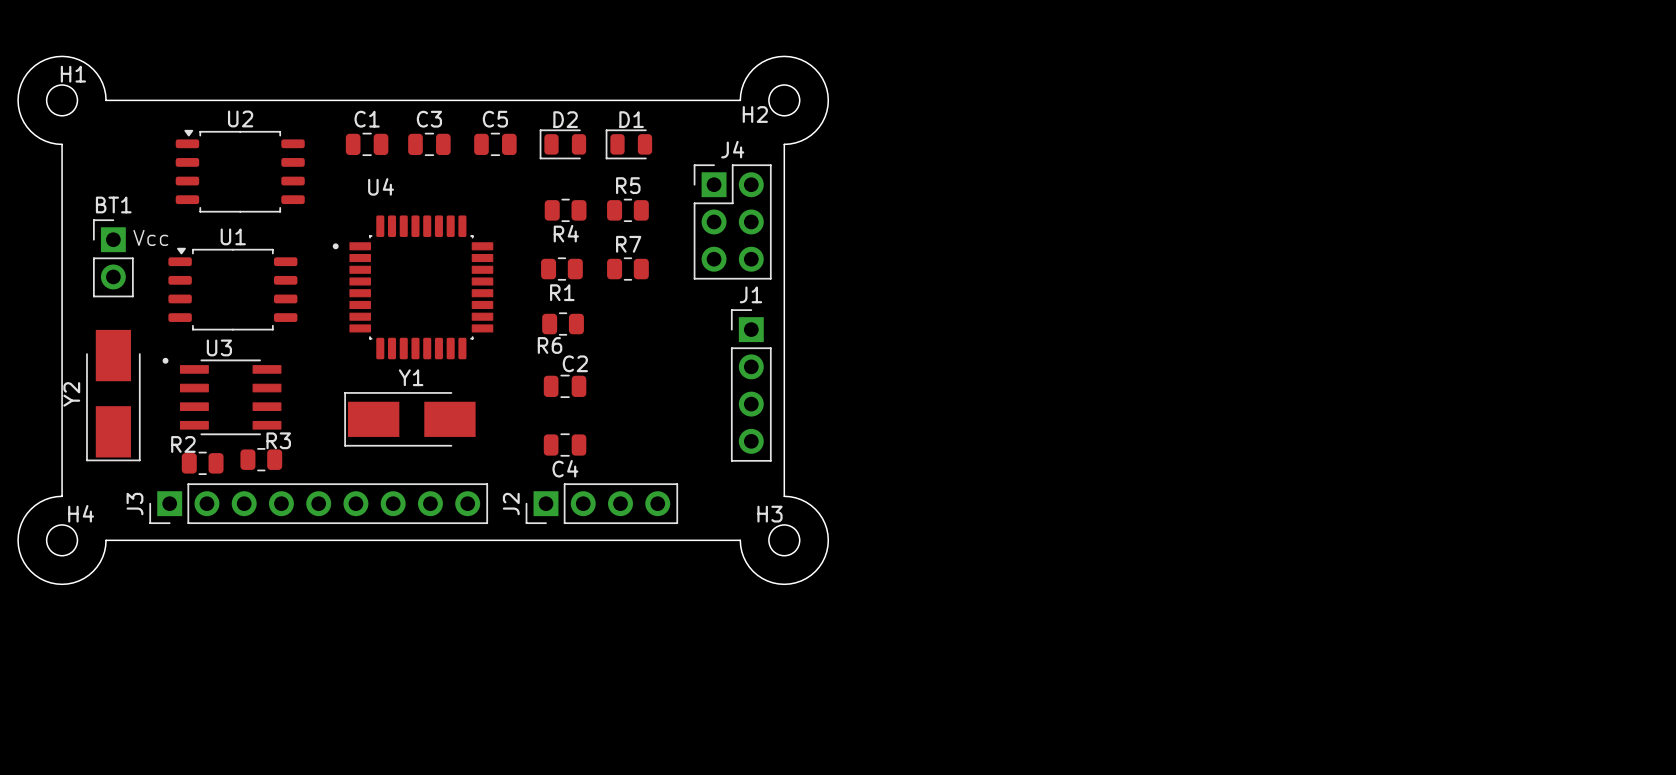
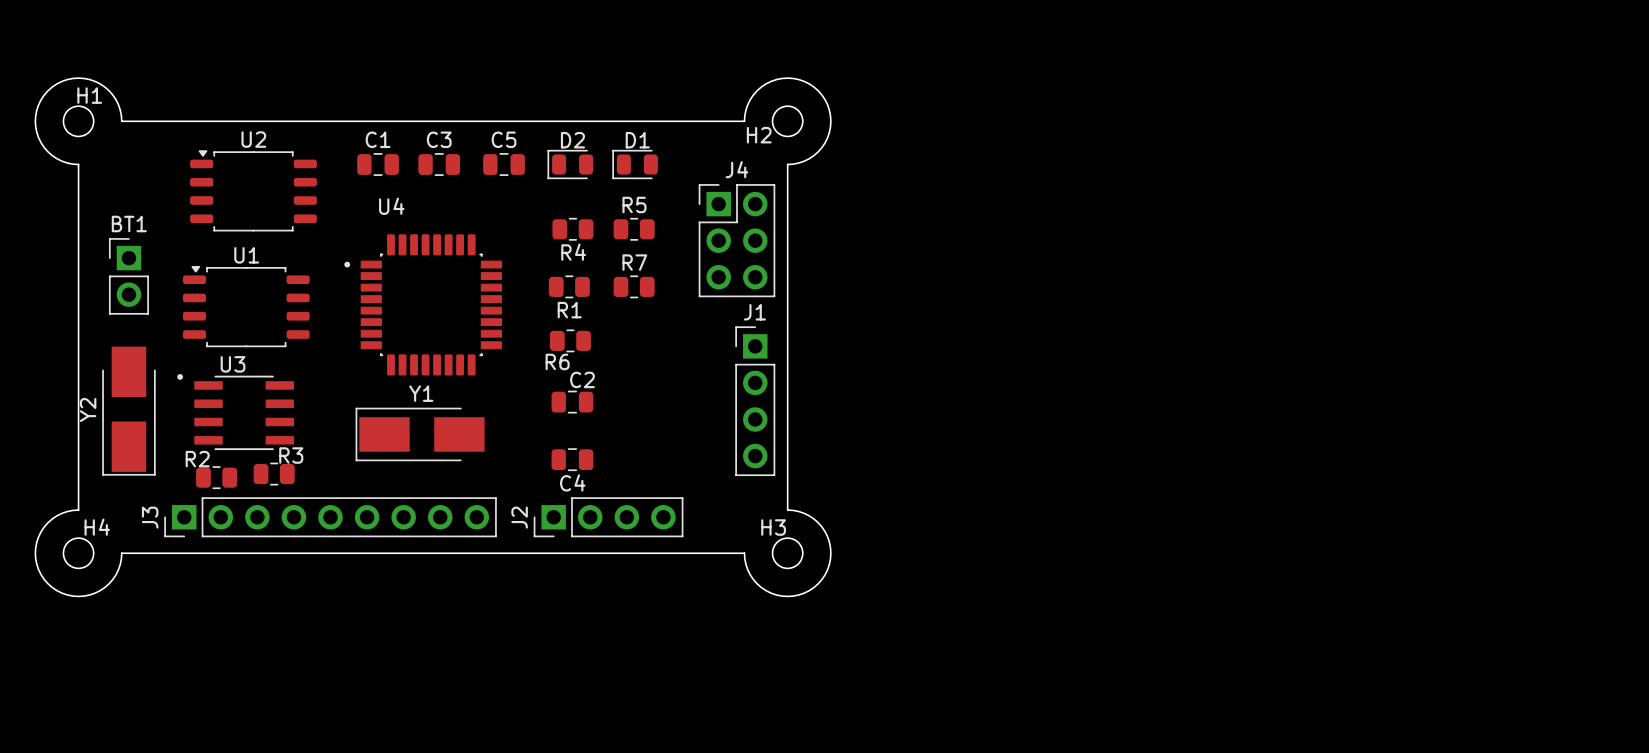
text: Vcc (150, 237) -> none

